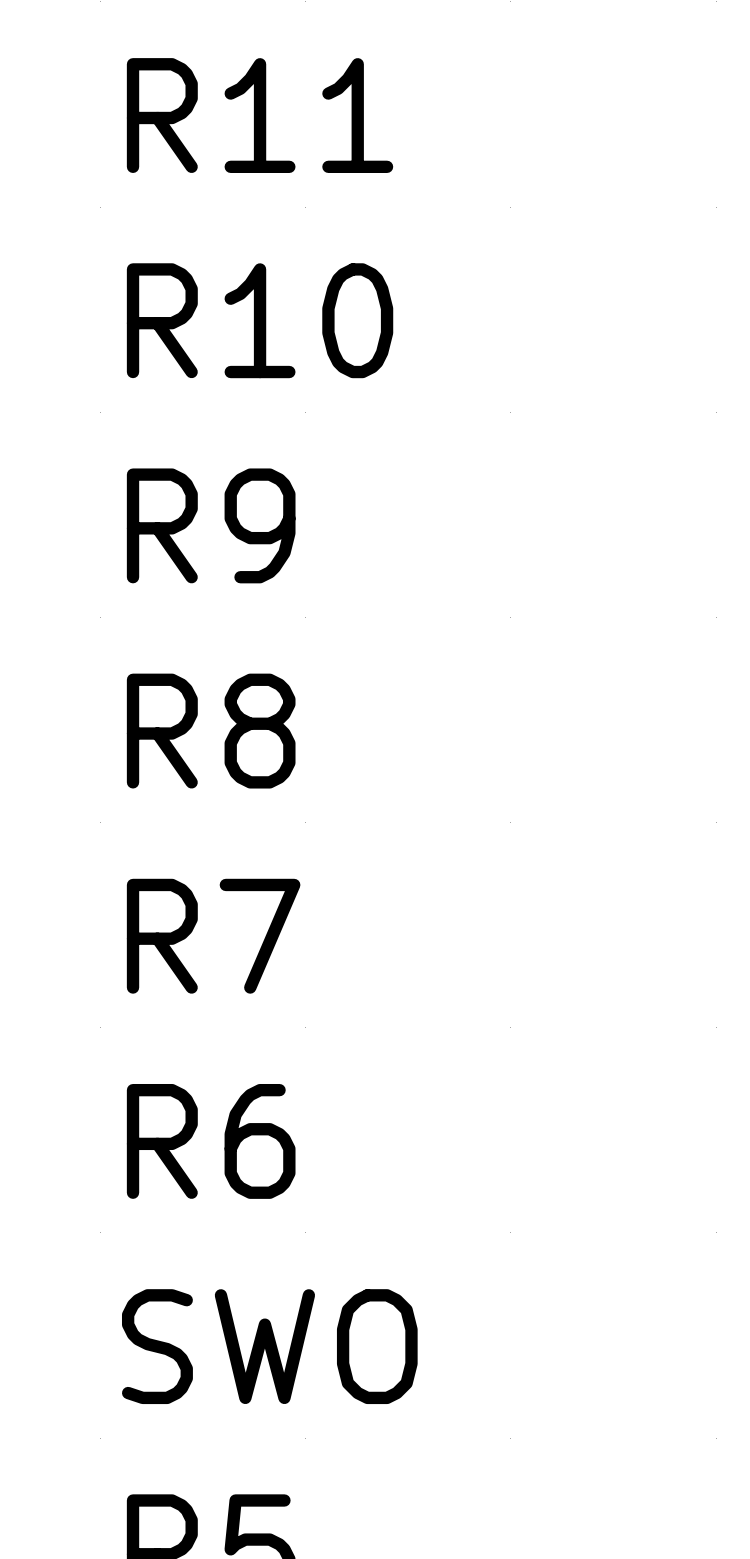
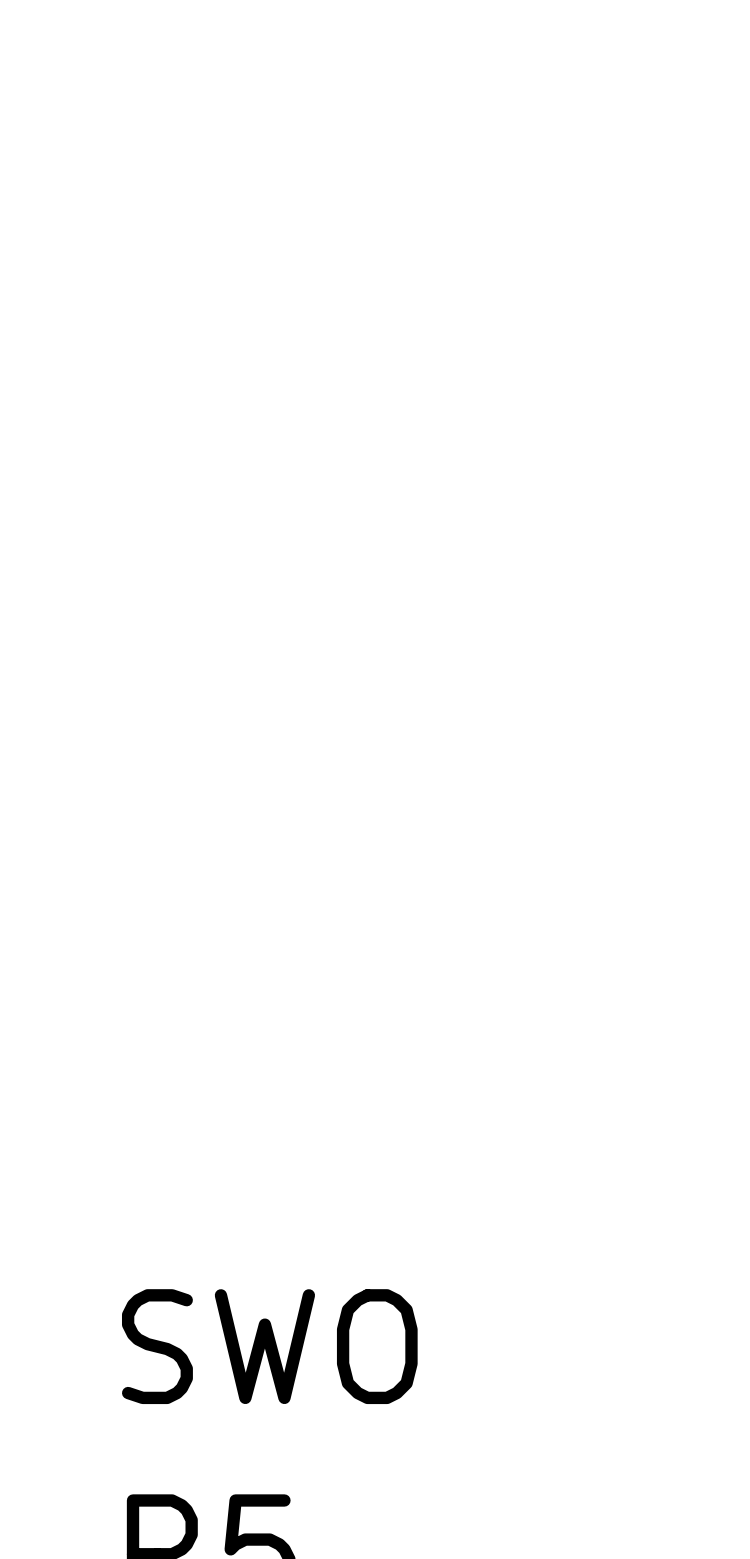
label: R11 (260, 115) -> none
label: R10 (260, 320) -> none
label: R9 (211, 525) -> none
label: R8 (211, 731) -> none
label: R7 (213, 936) -> none
label: R6 (211, 1141) -> none

